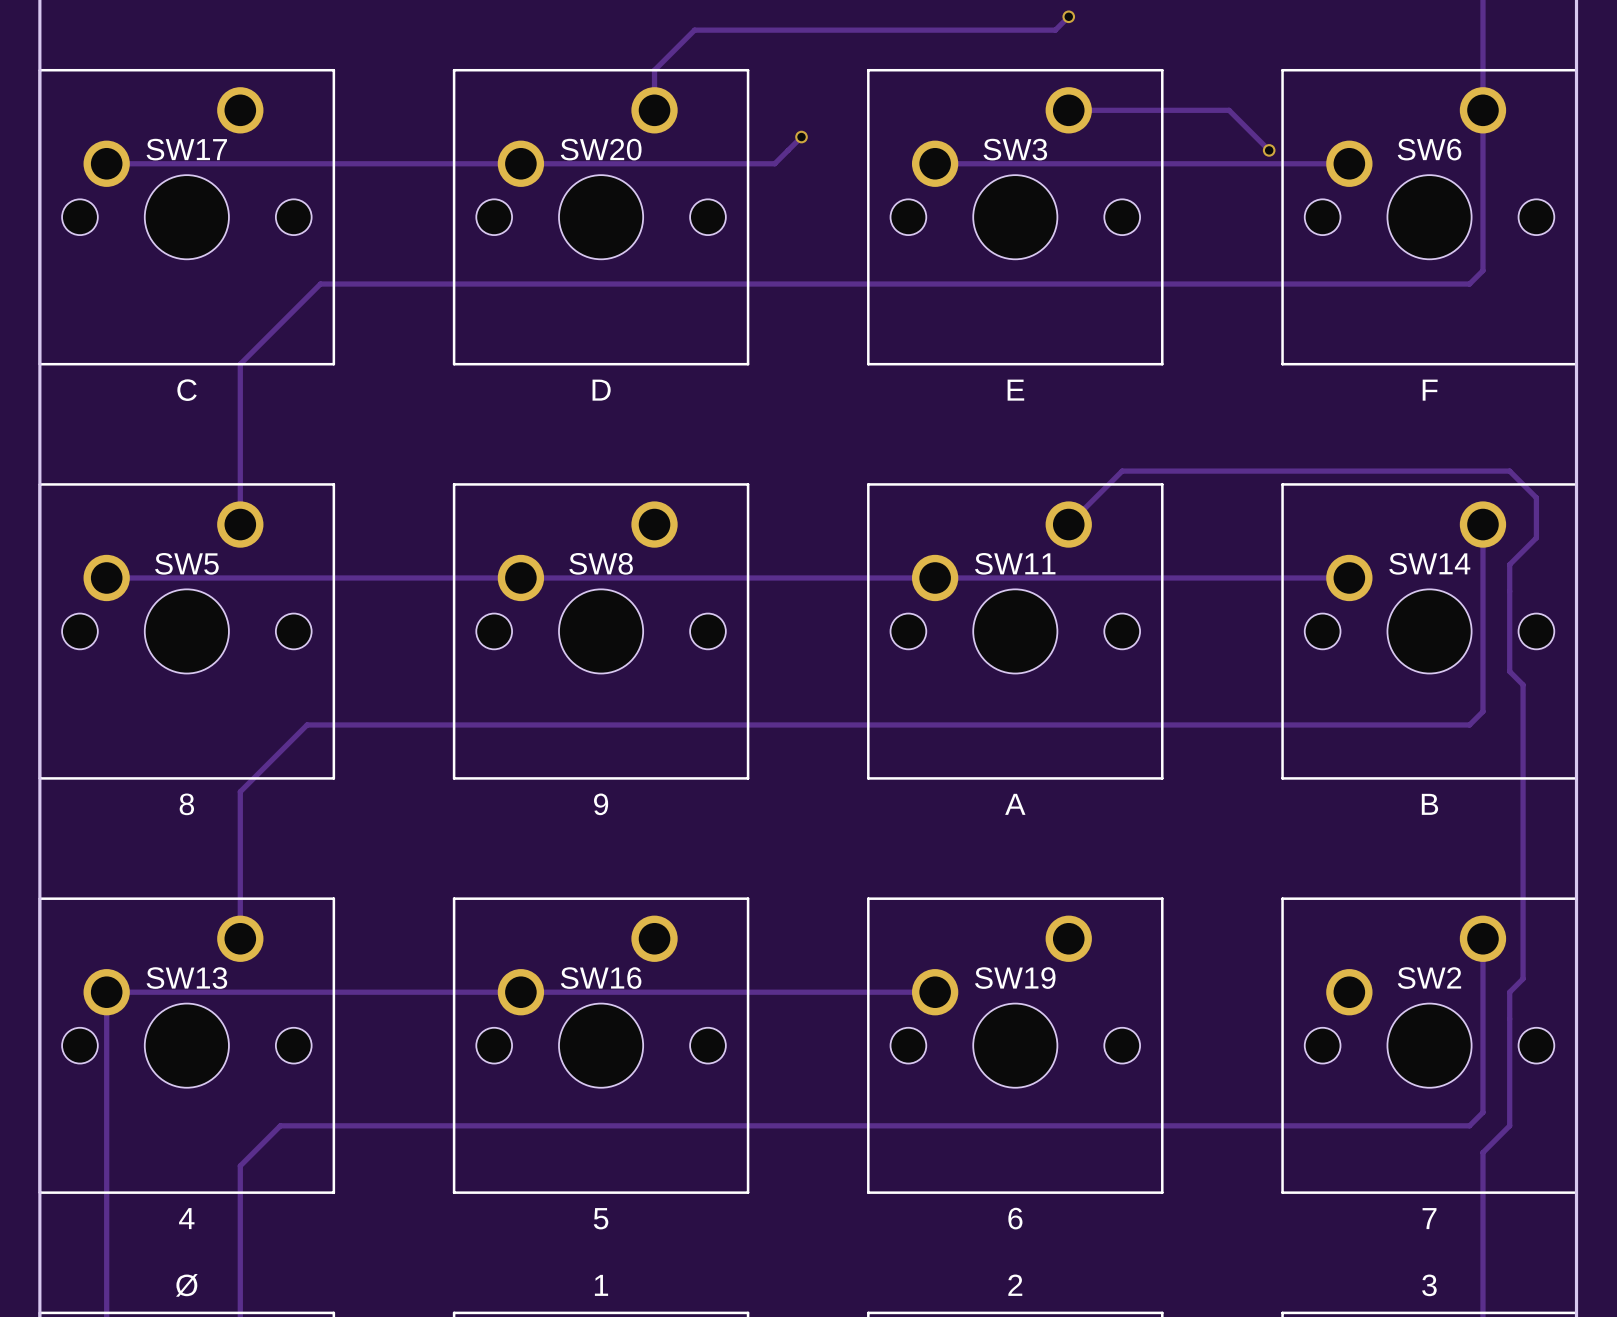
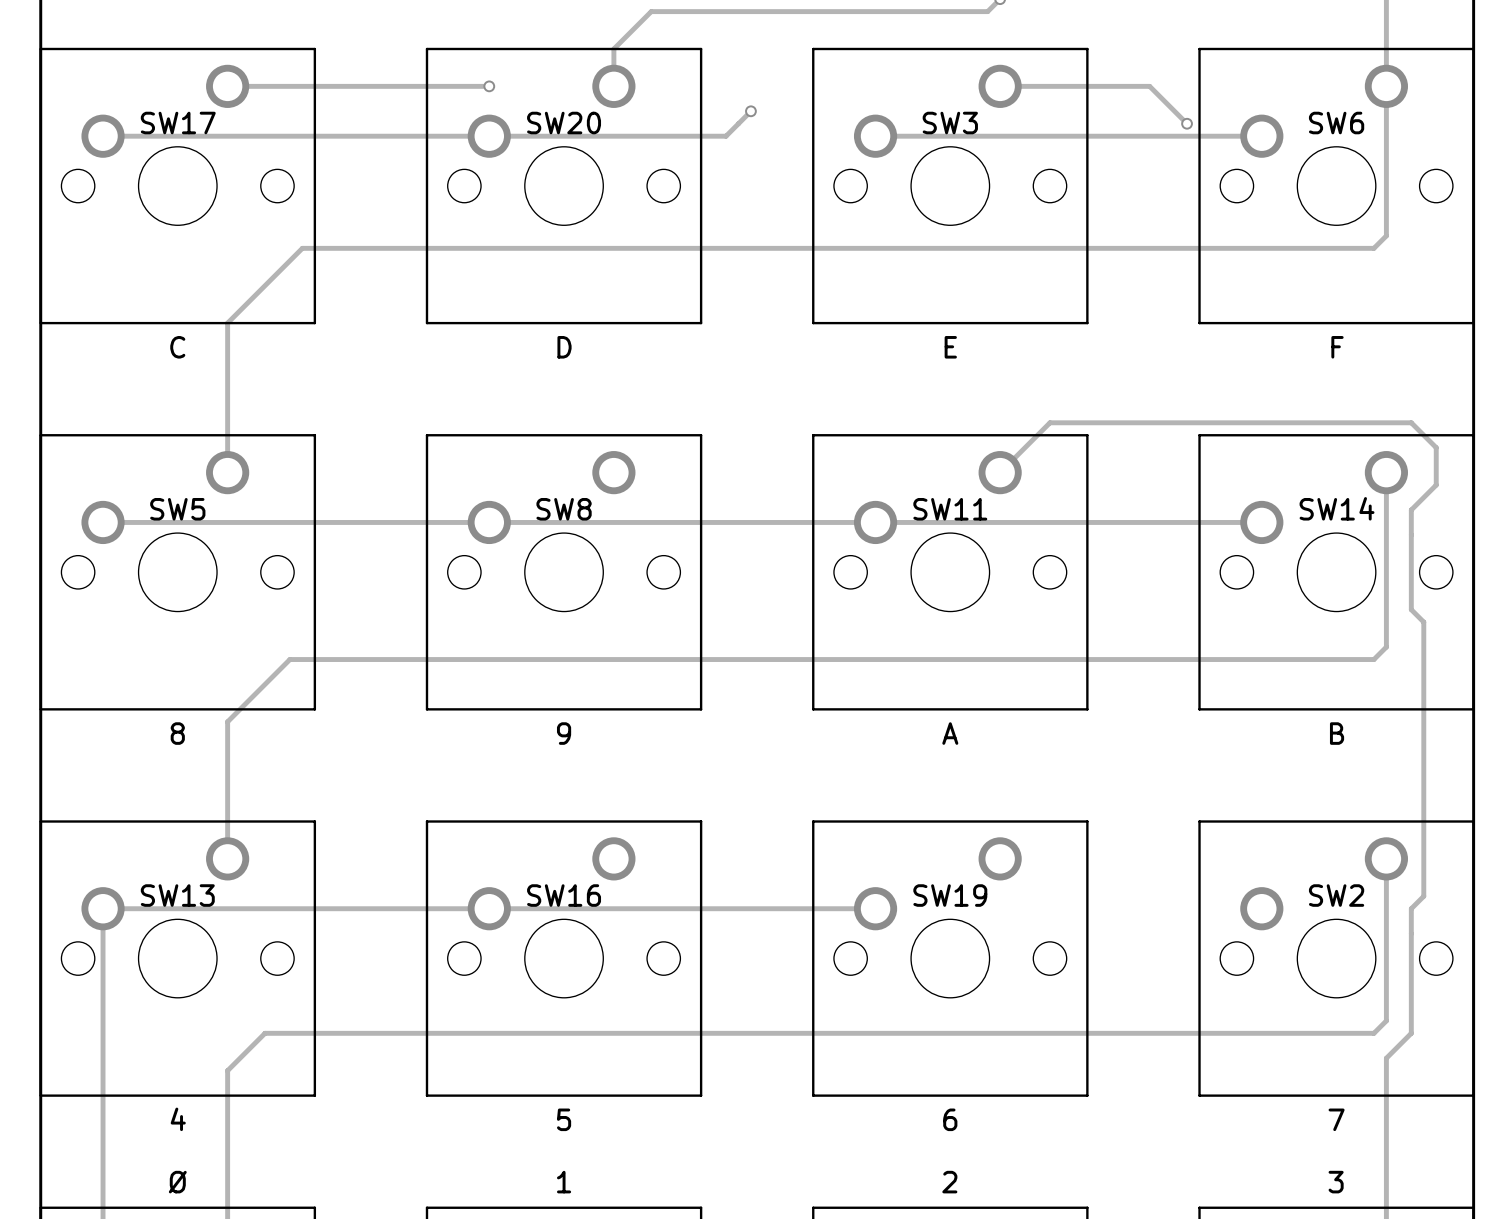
track: none -> (227, 86) (489, 86)
via: none -> (489, 86)

